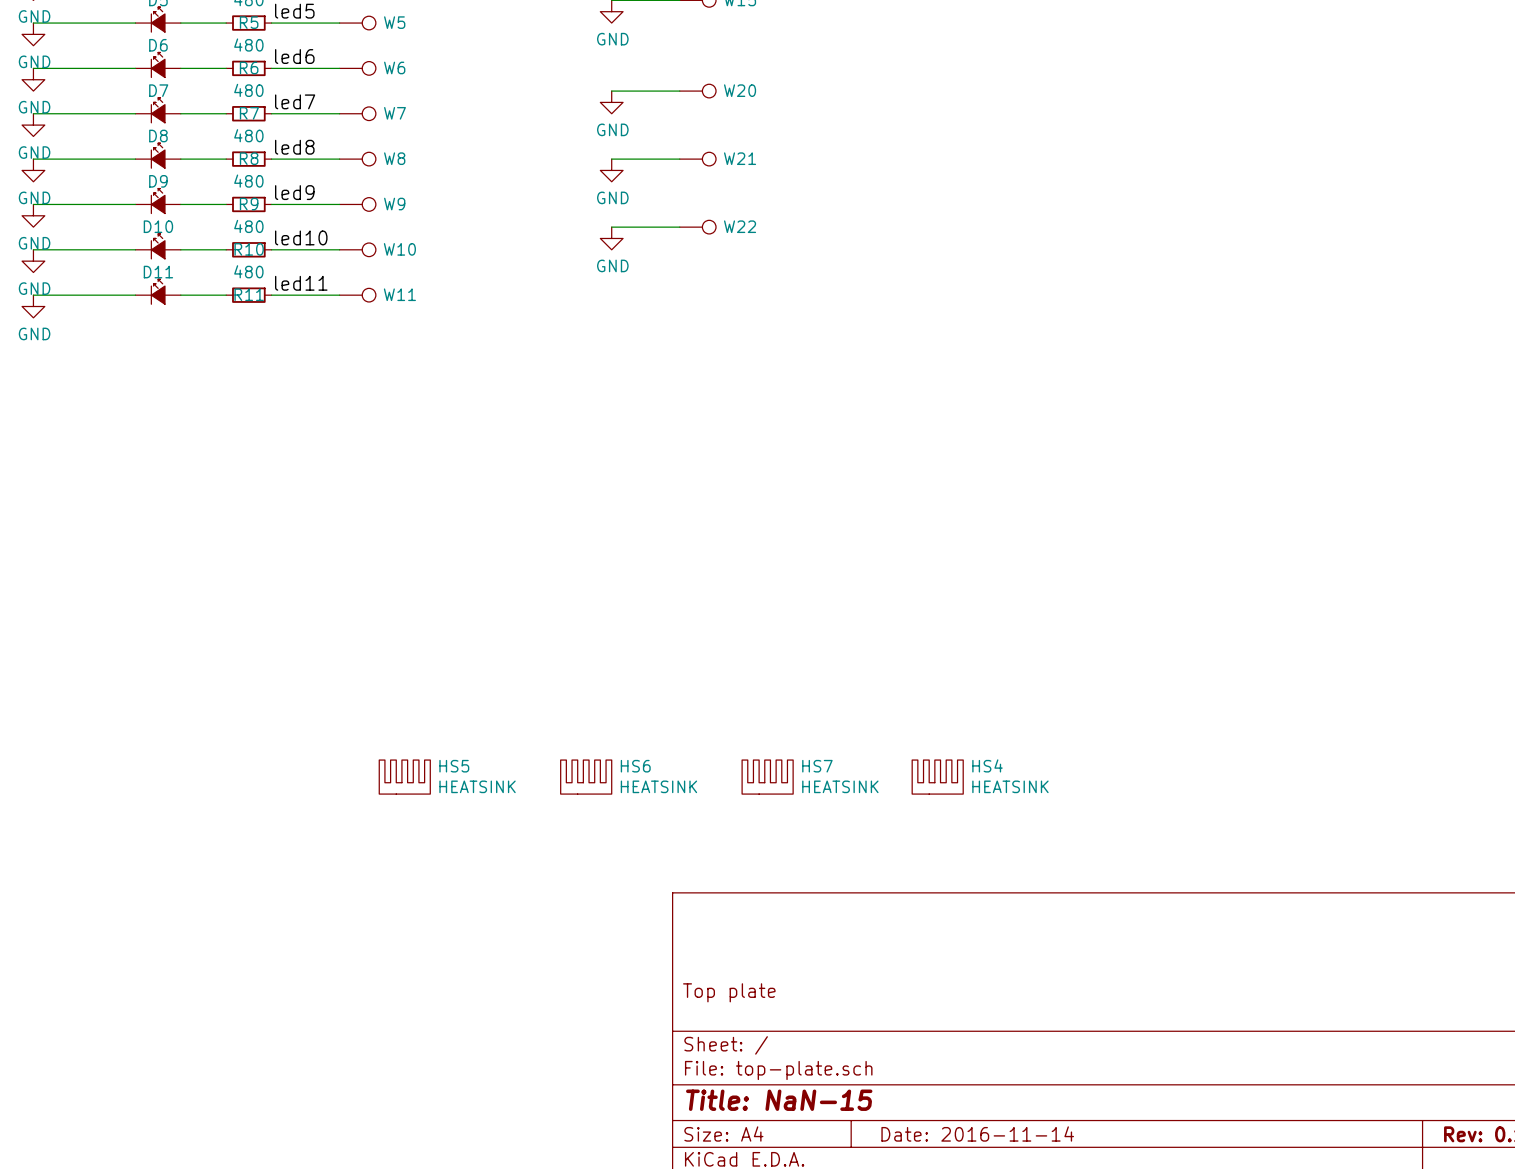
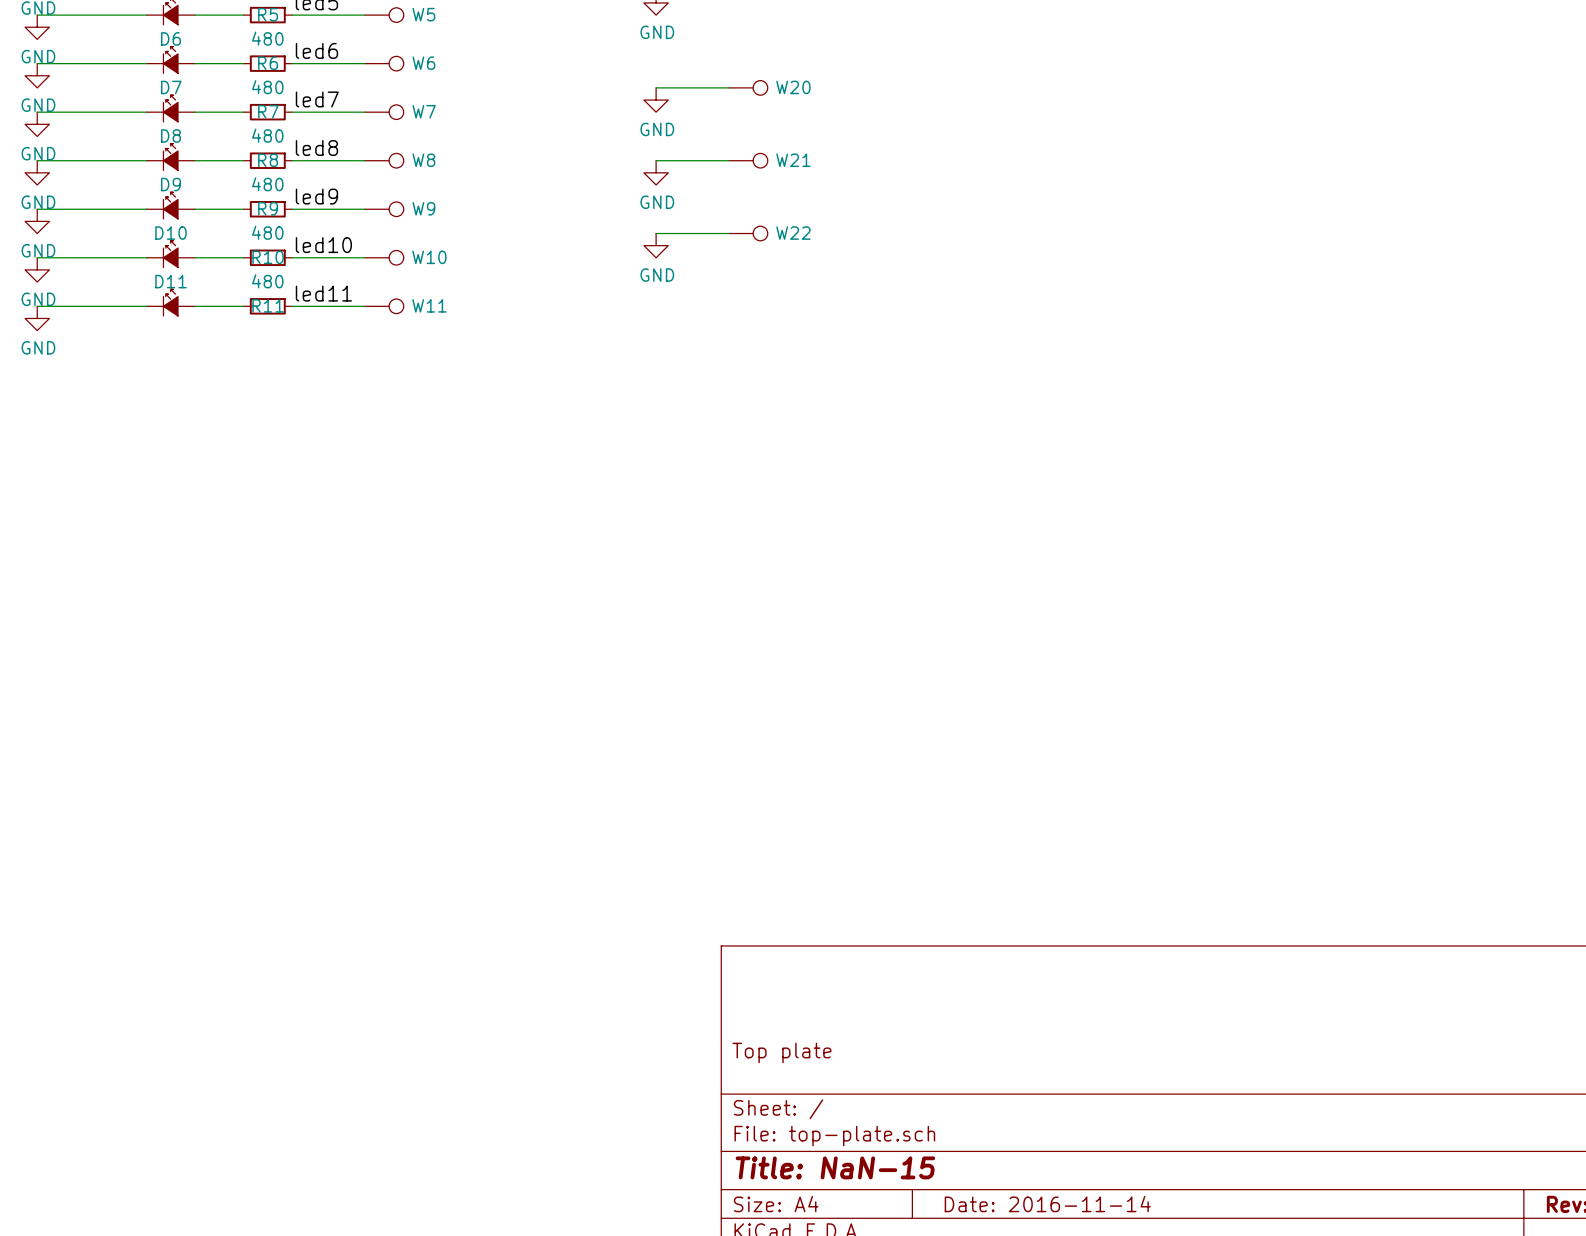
HS5: HEATSINK (404, 777) -> none
HS6: HEATSINK (586, 777) -> none
HS7: HEATSINK (767, 777) -> none
HS4: HEATSINK (937, 777) -> none

